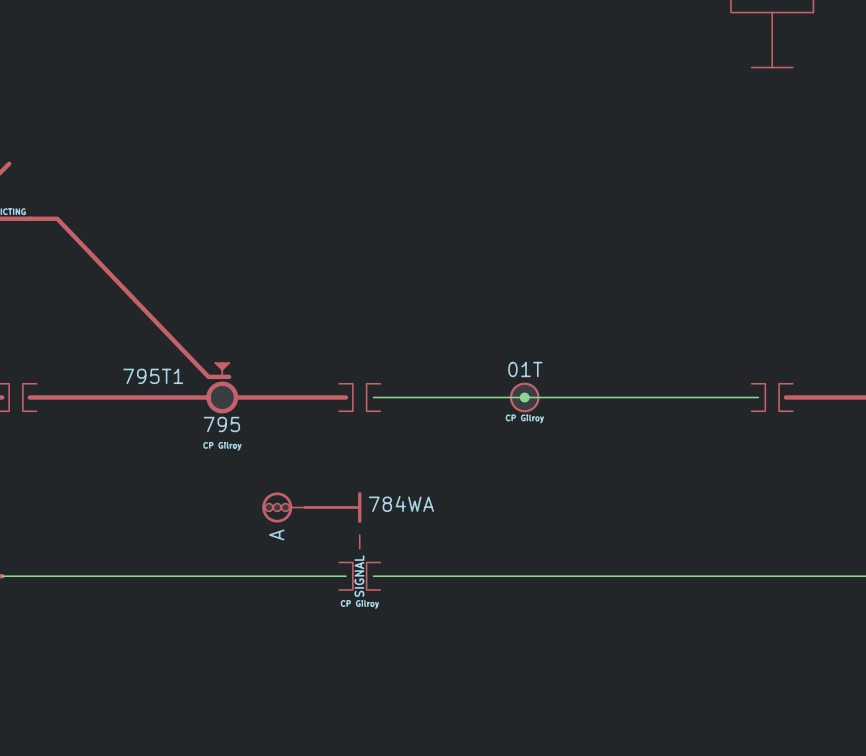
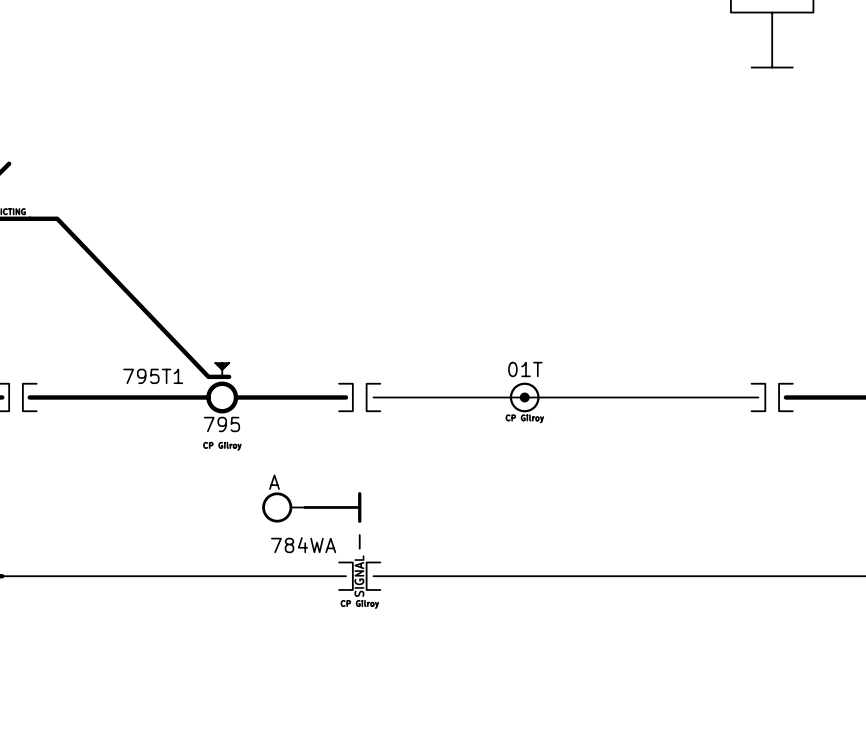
part symbol: [262, 492, 293, 523] -> [262, 492, 293, 523]
part value position: 784WA (401, 503) -> 784WA (303, 545)
part value position: A (276, 534) -> A (274, 482)

